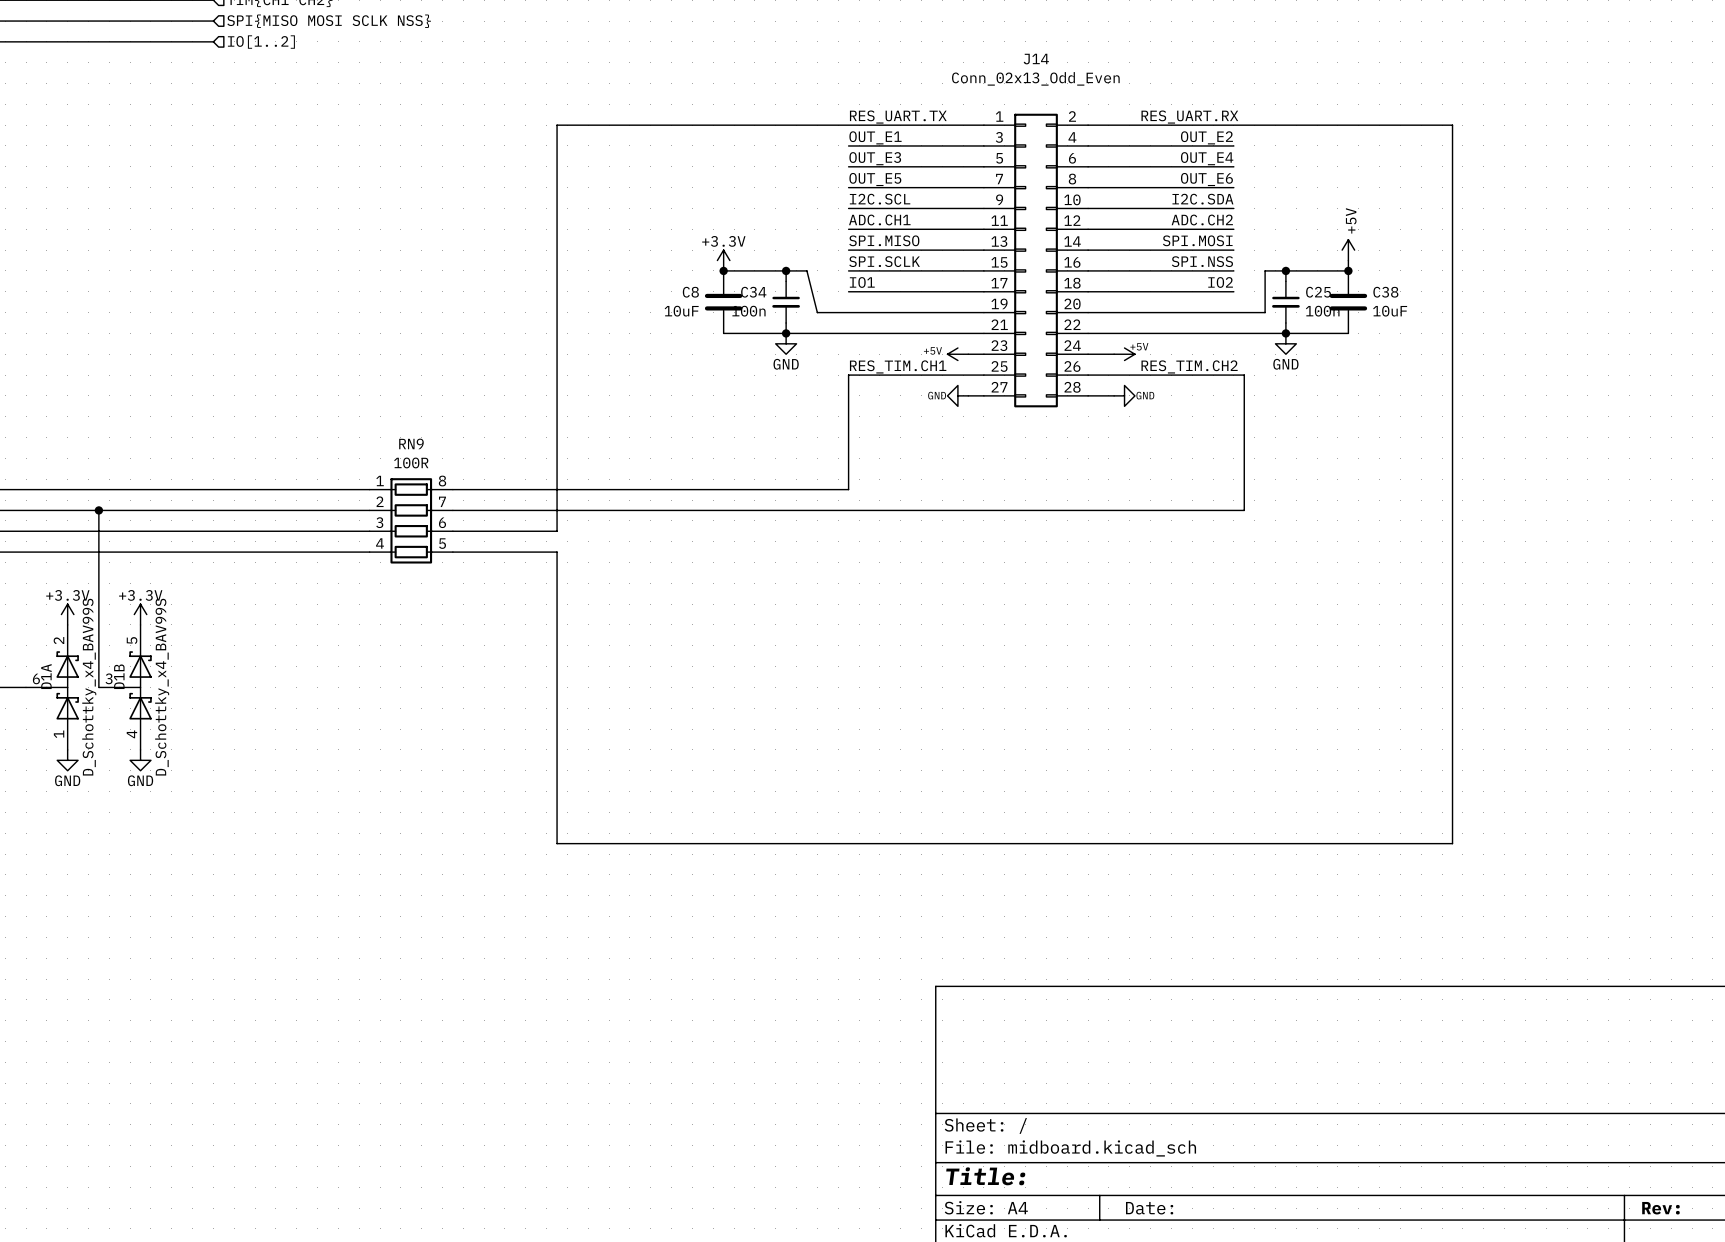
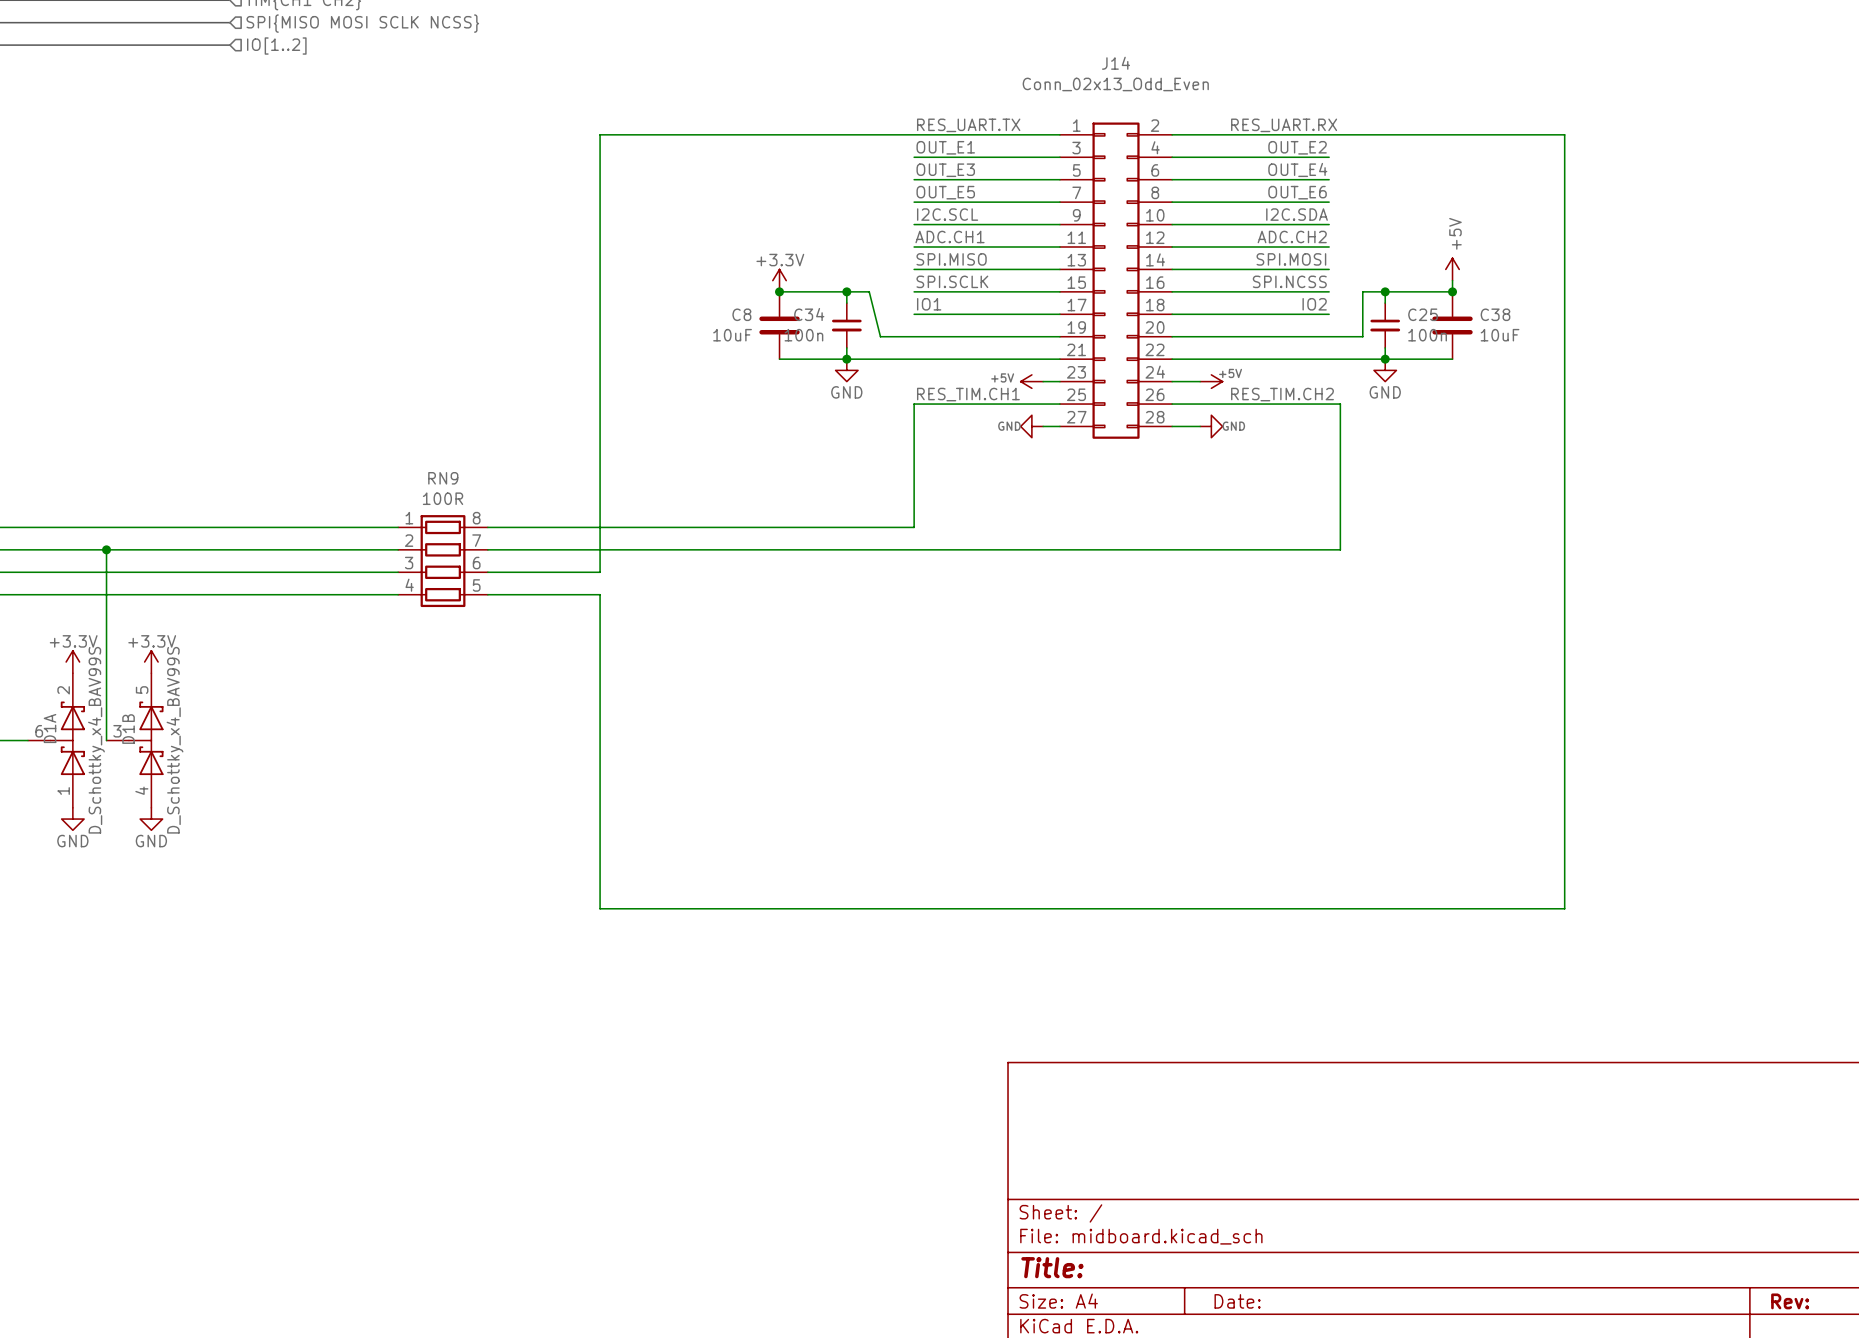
hierarchical label: SPI{MISO MOSI SCLK NSS} (329, 21) -> SPI{MISO MOSI SCLK NCSS} (362, 23)
label: SPI.NSS (1202, 261) -> SPI.NCSS (1289, 281)

